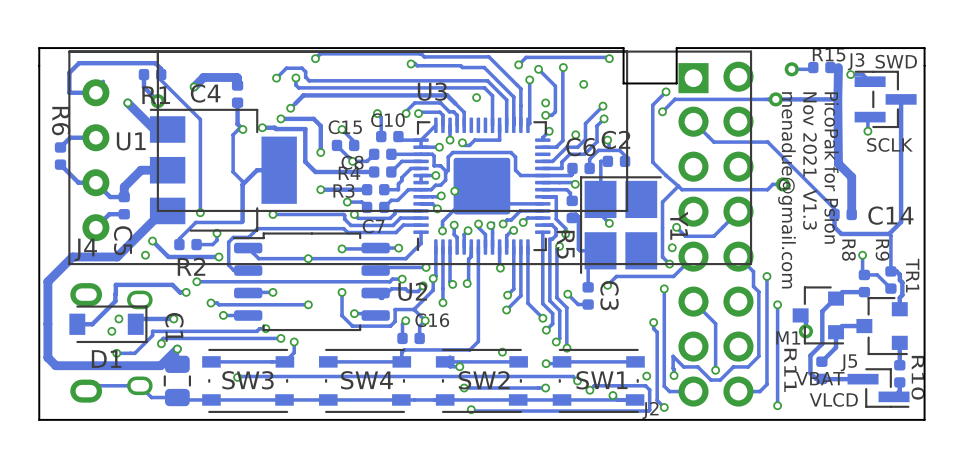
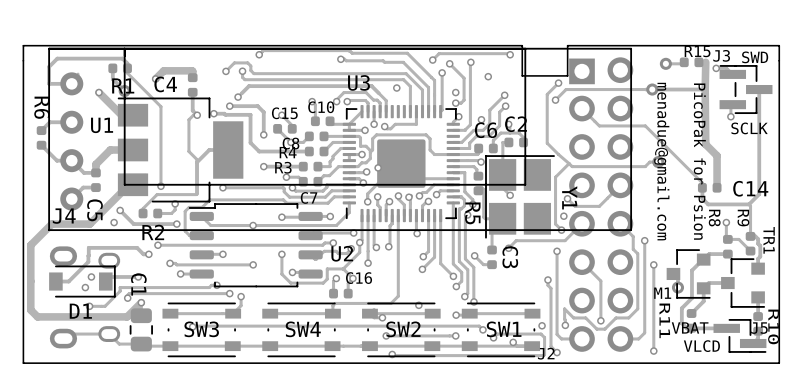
text: Nov 2021 V1.3 (809, 161) -> none
J5 name position: J5 (848, 362) -> J5 (759, 328)

